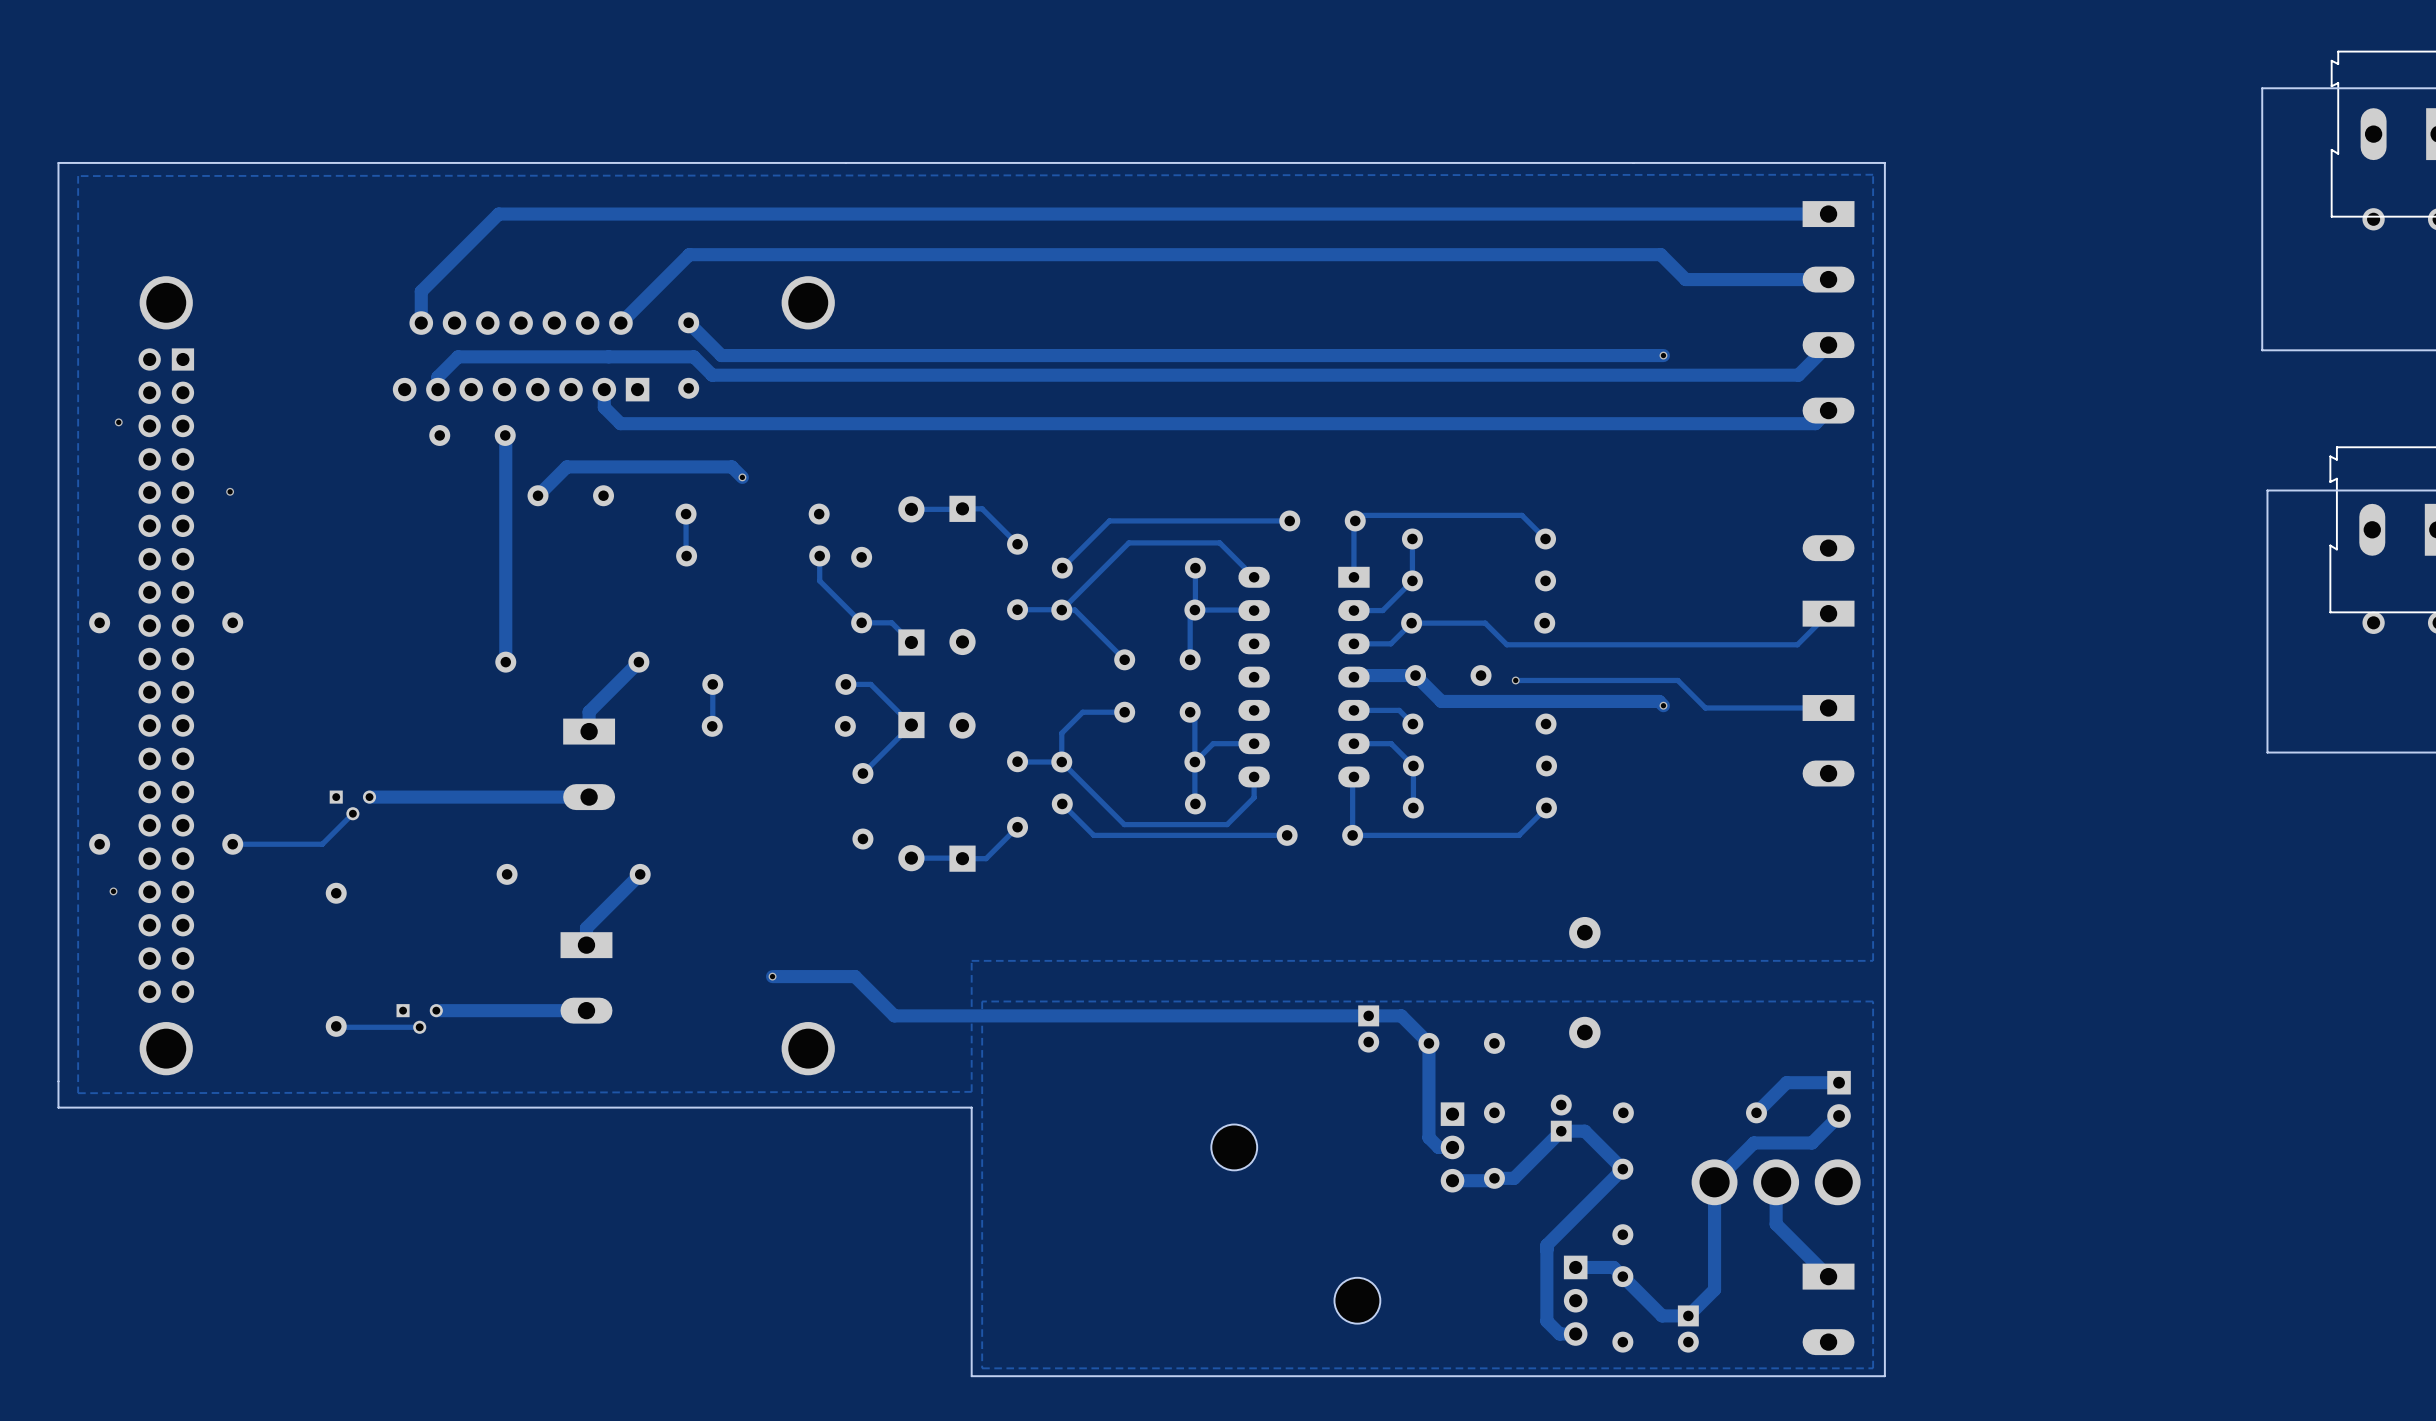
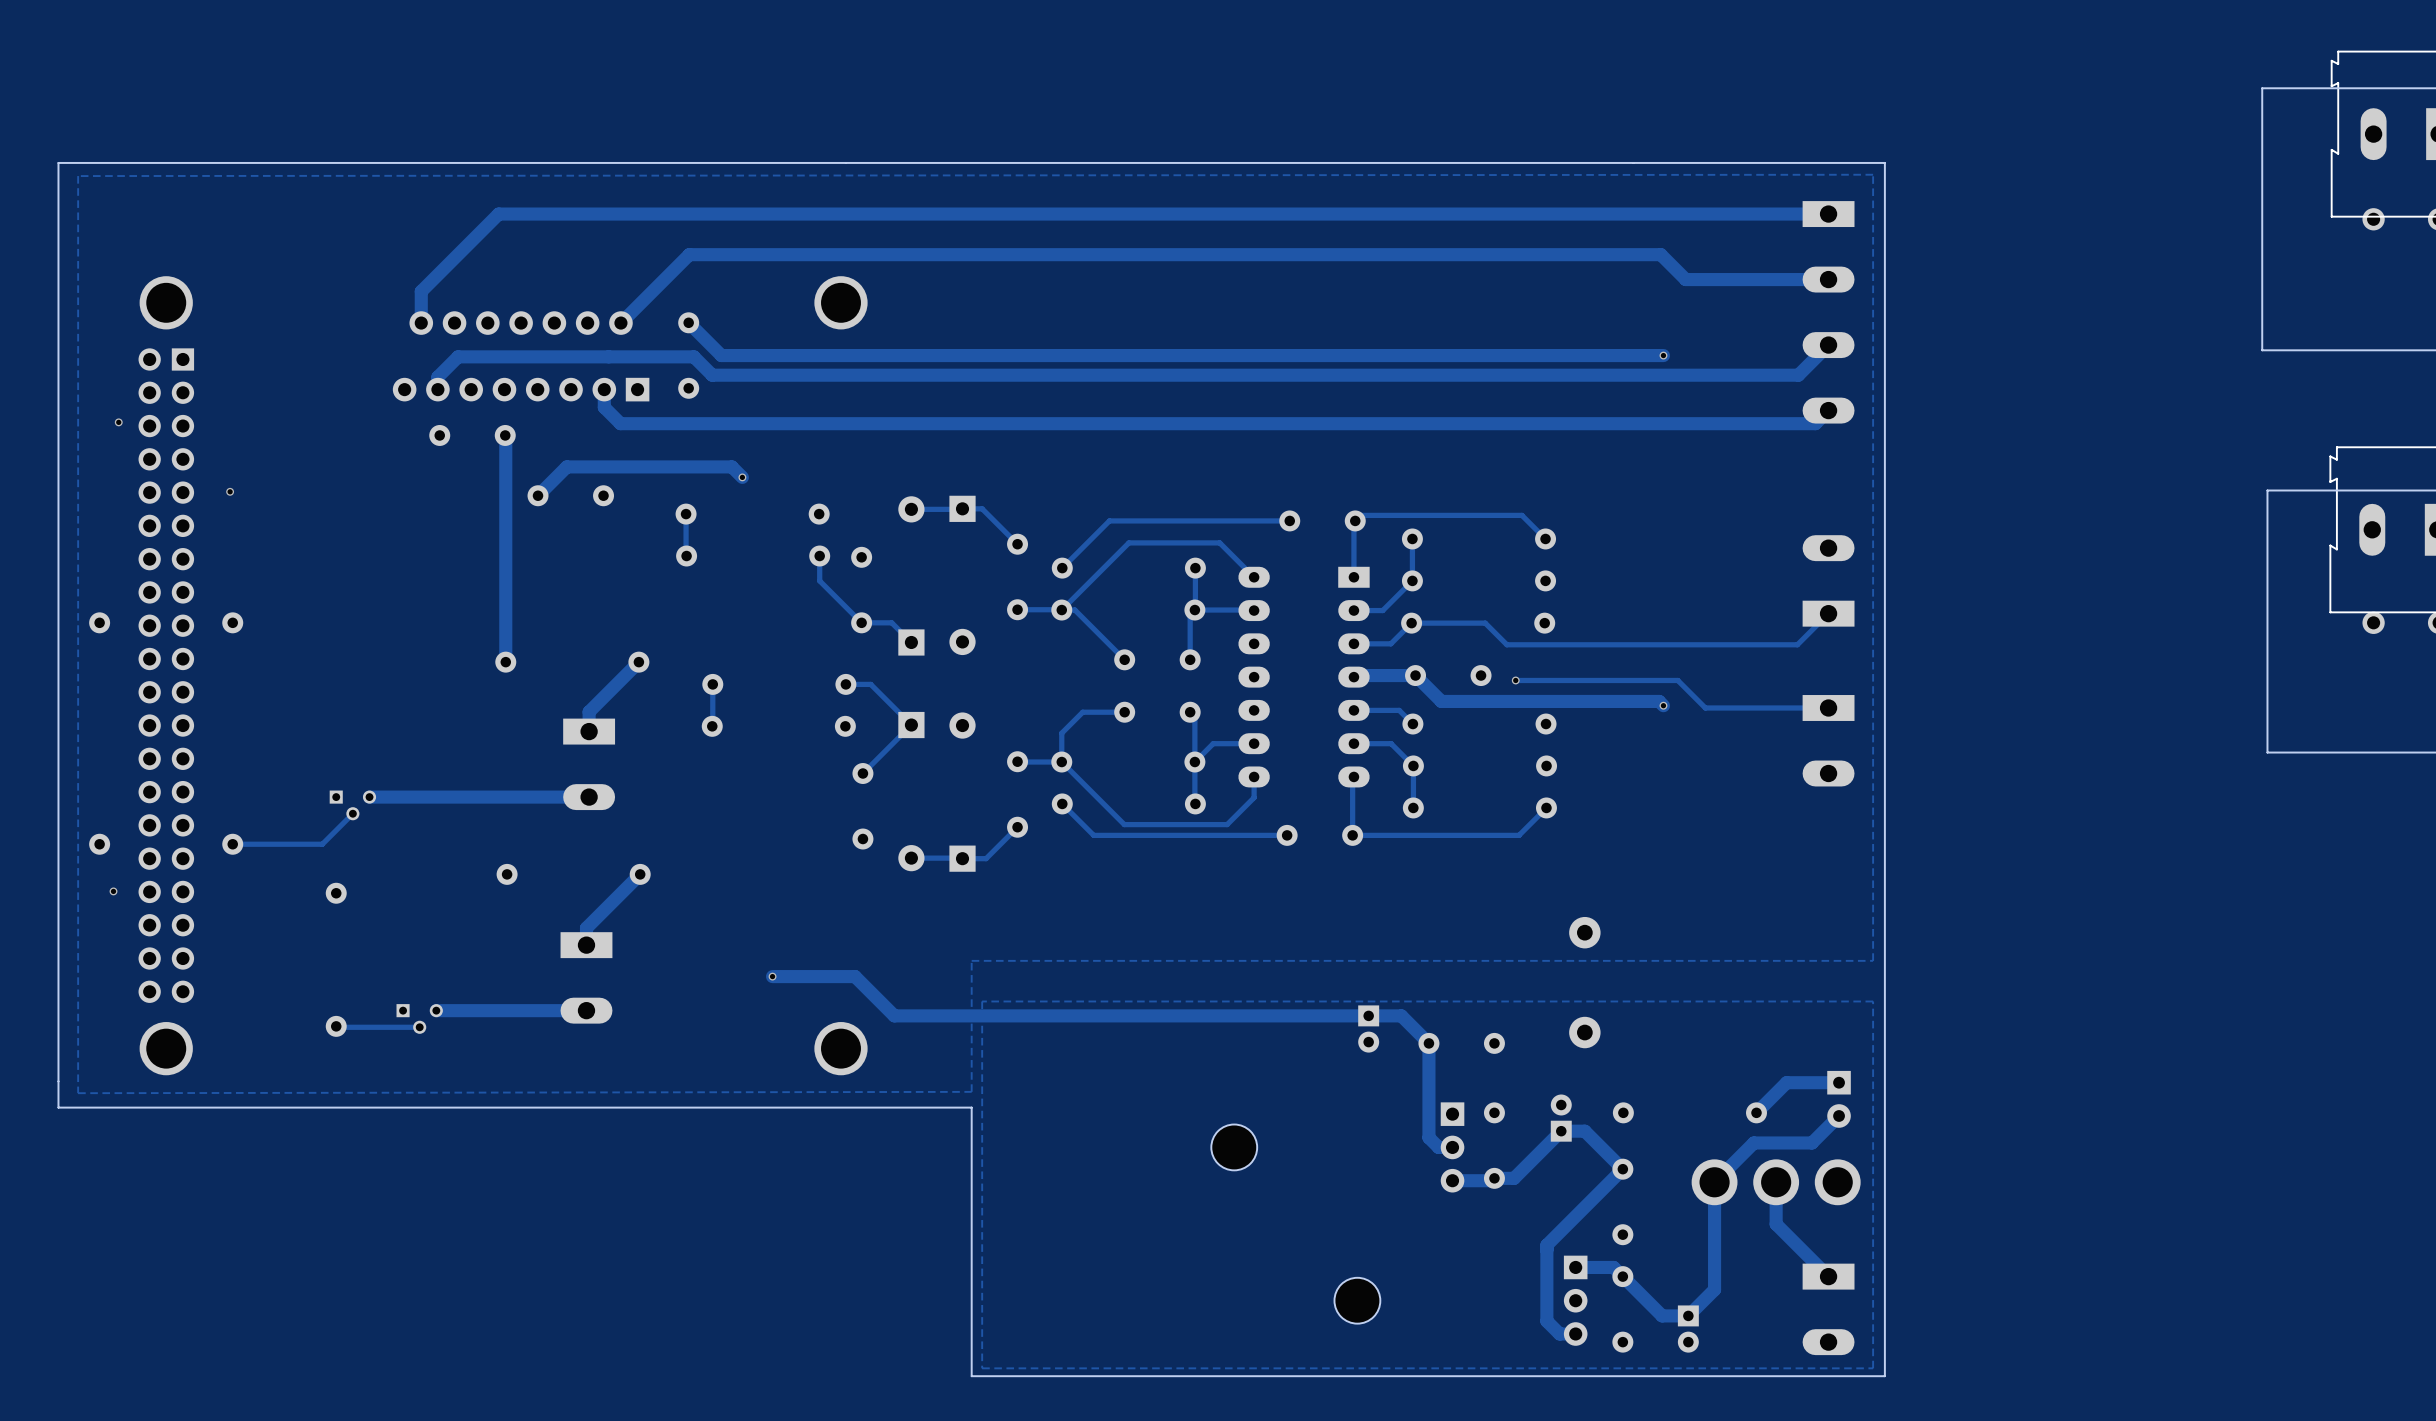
part position: (808, 302) -> (840, 302)
part position: (808, 1048) -> (840, 1048)

